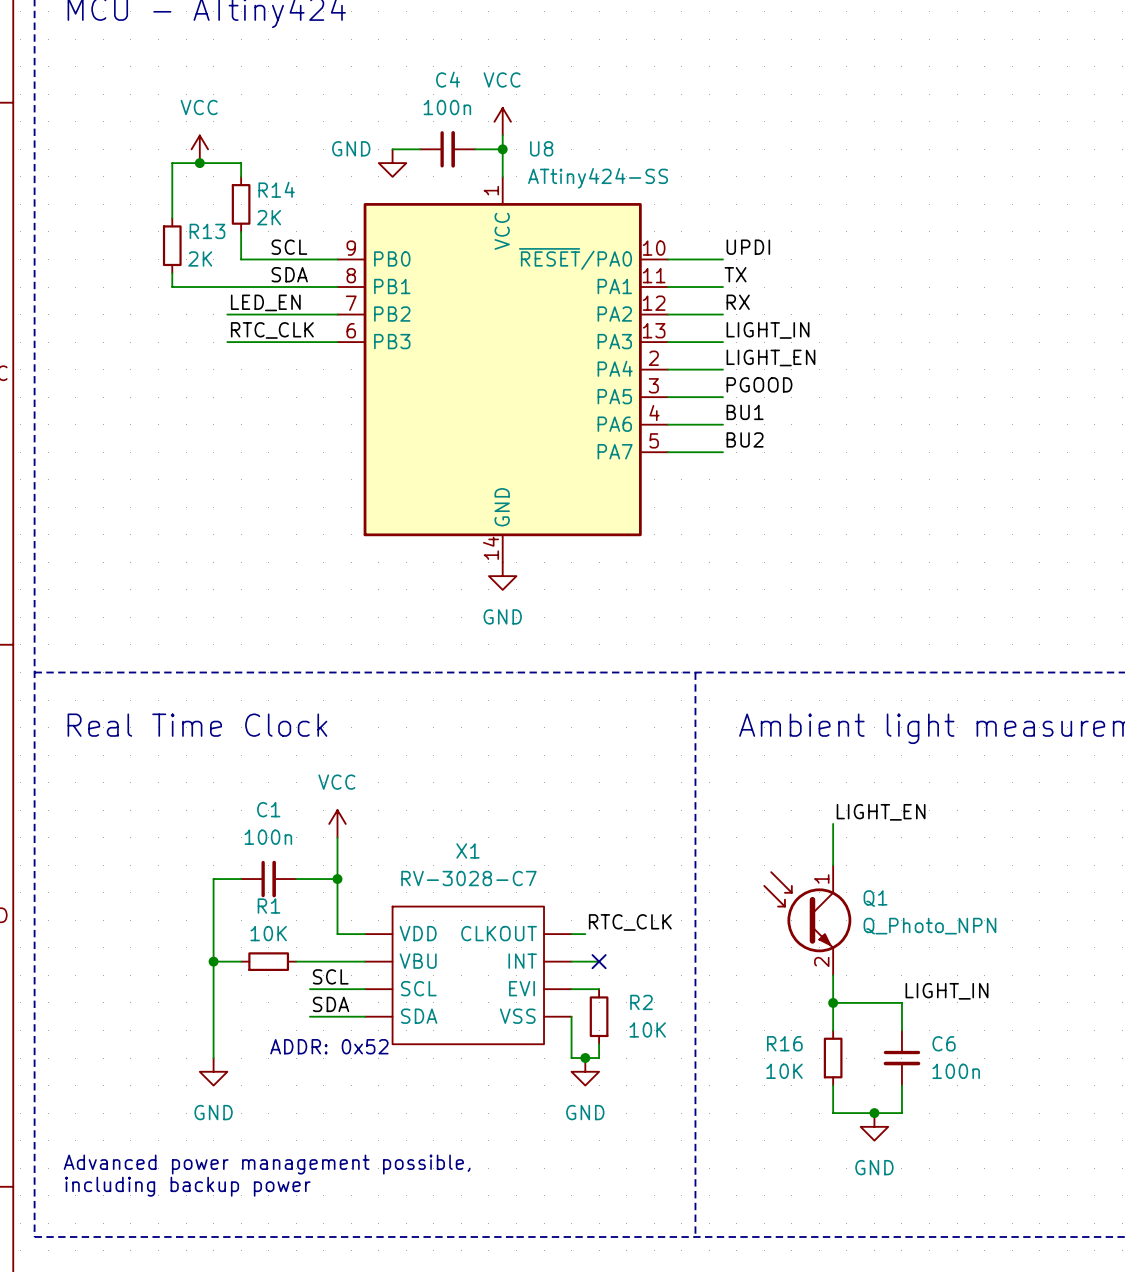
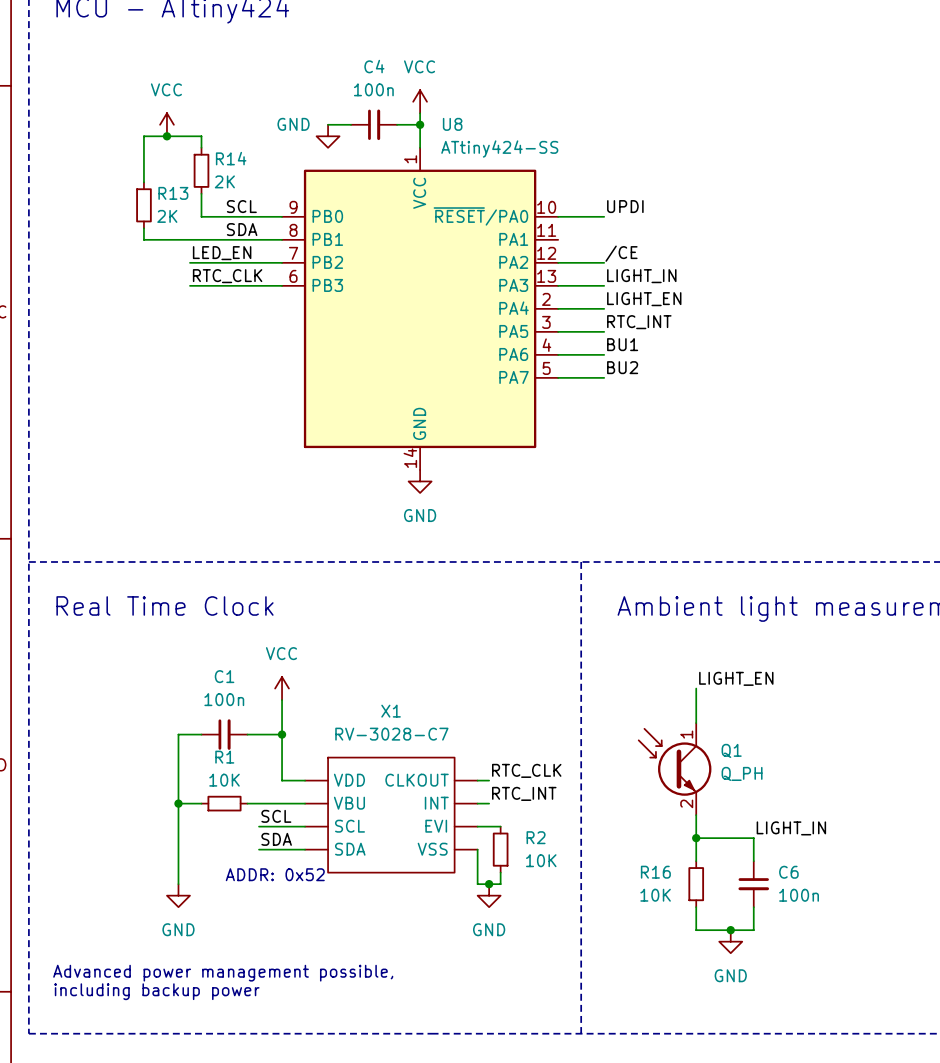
label: TX (735, 274) -> none
wire: (667, 287) (722, 287) -> none
label: RX (738, 302) -> /CE (621, 253)
label: PGOOD (759, 384) -> RTC_INT (639, 322)
Q1 value: Q_Photo_NPN (929, 926) -> Q_PH (742, 773)
label: none -> RTC_INT (524, 793)
wire: (585, 961) (599, 961) -> none
no-connect mark: (599, 961) -> none

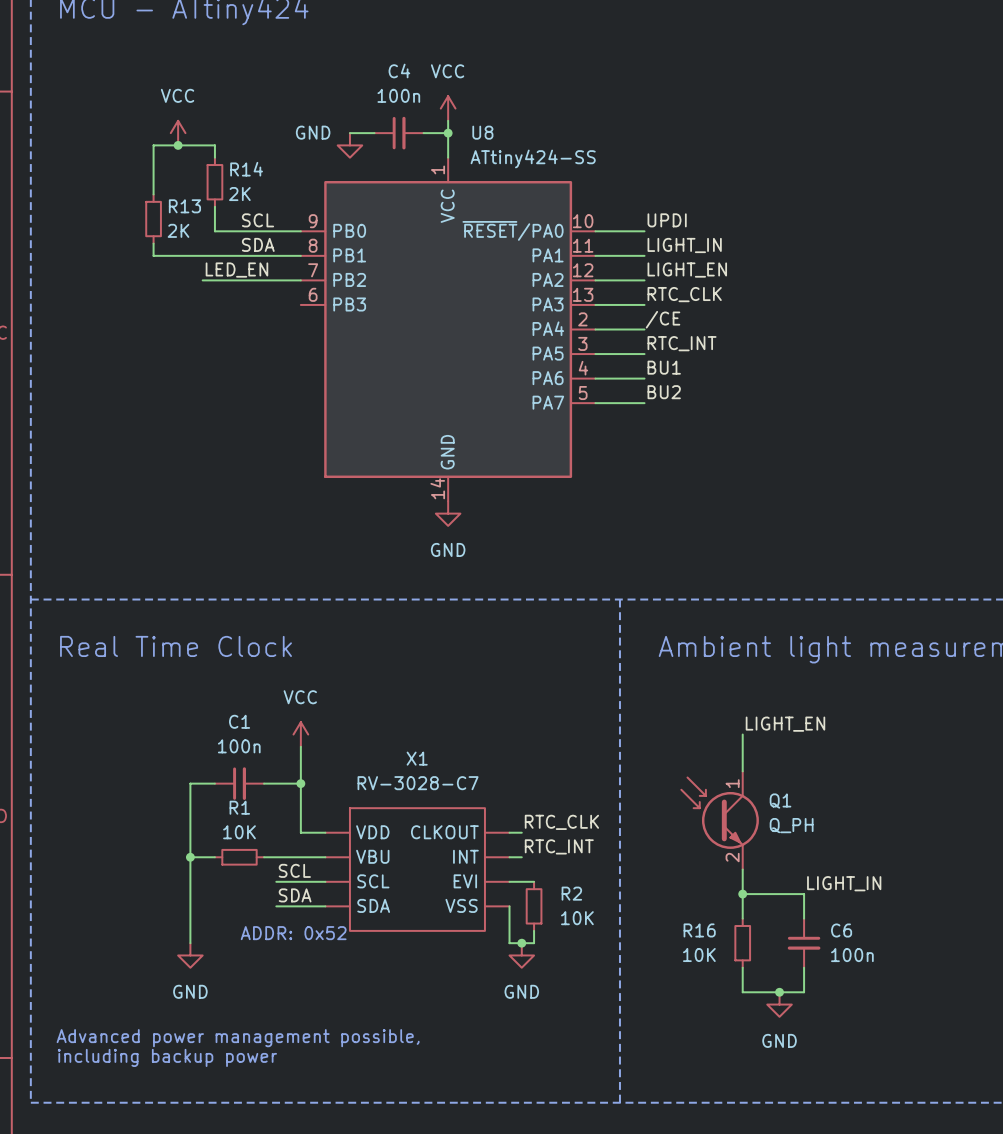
label: none -> LIGHT_IN (684, 245)
wire: none -> (595, 255) (644, 255)
label: /CE (621, 253) -> LIGHT_EN (687, 270)
label: RTC_CLK (227, 276) -> none
label: LIGHT_IN (641, 276) -> RTC_CLK (684, 294)
wire: (189, 285) (282, 285) -> none
label: LIGHT_EN (644, 299) -> /CE (663, 319)

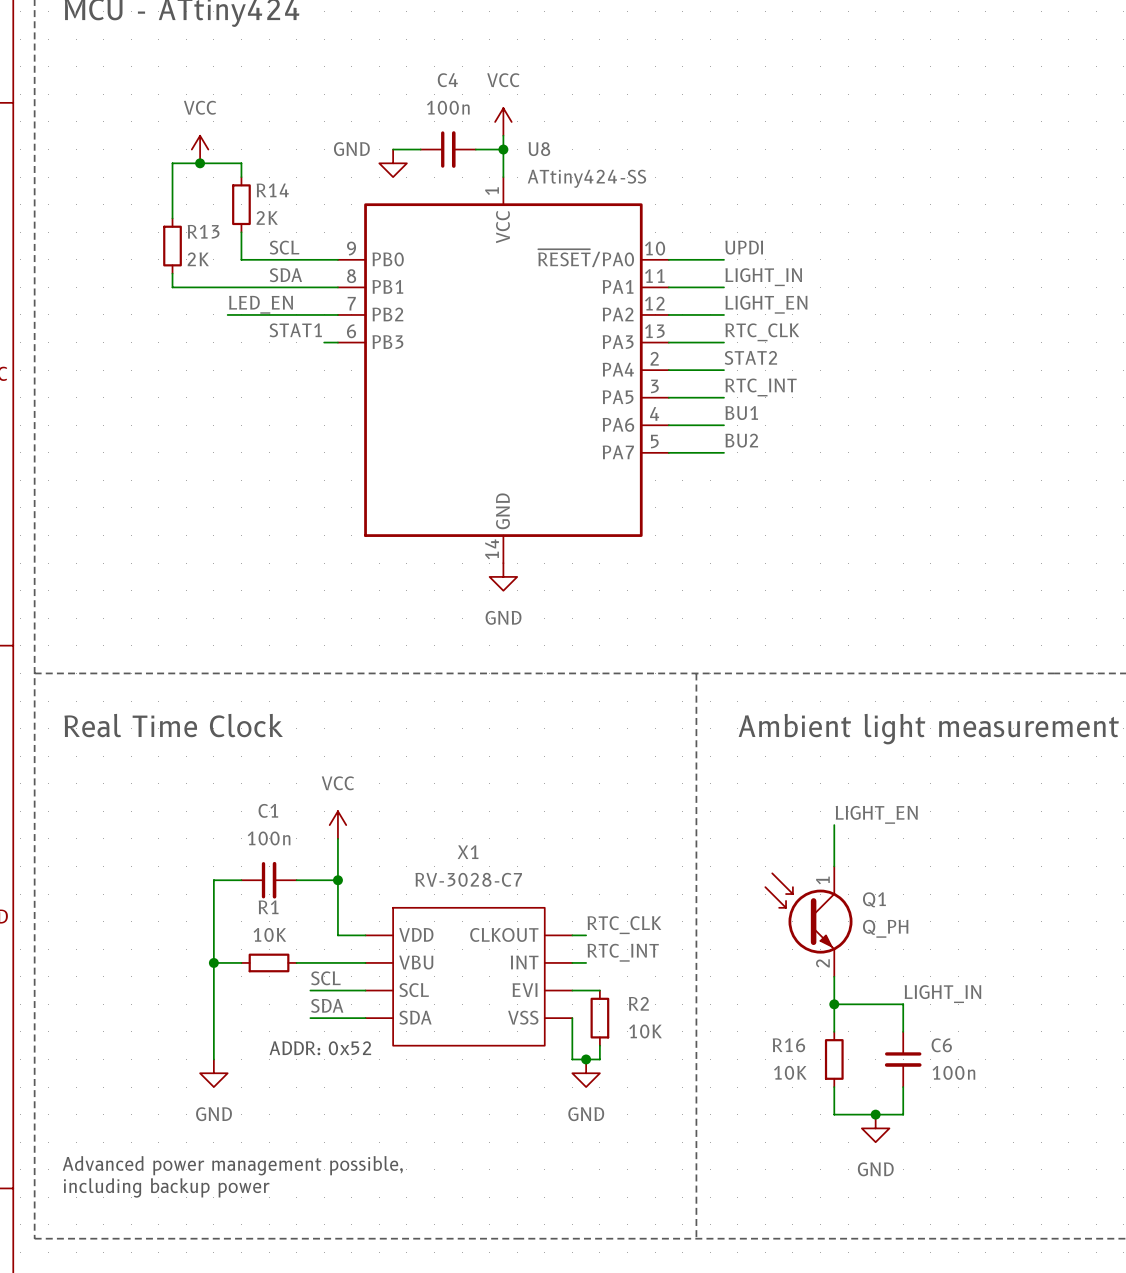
label: none -> STAT1 (295, 330)
wire: none -> (324, 342) (337, 342)
label: /CE (663, 319) -> STAT2 (750, 357)

